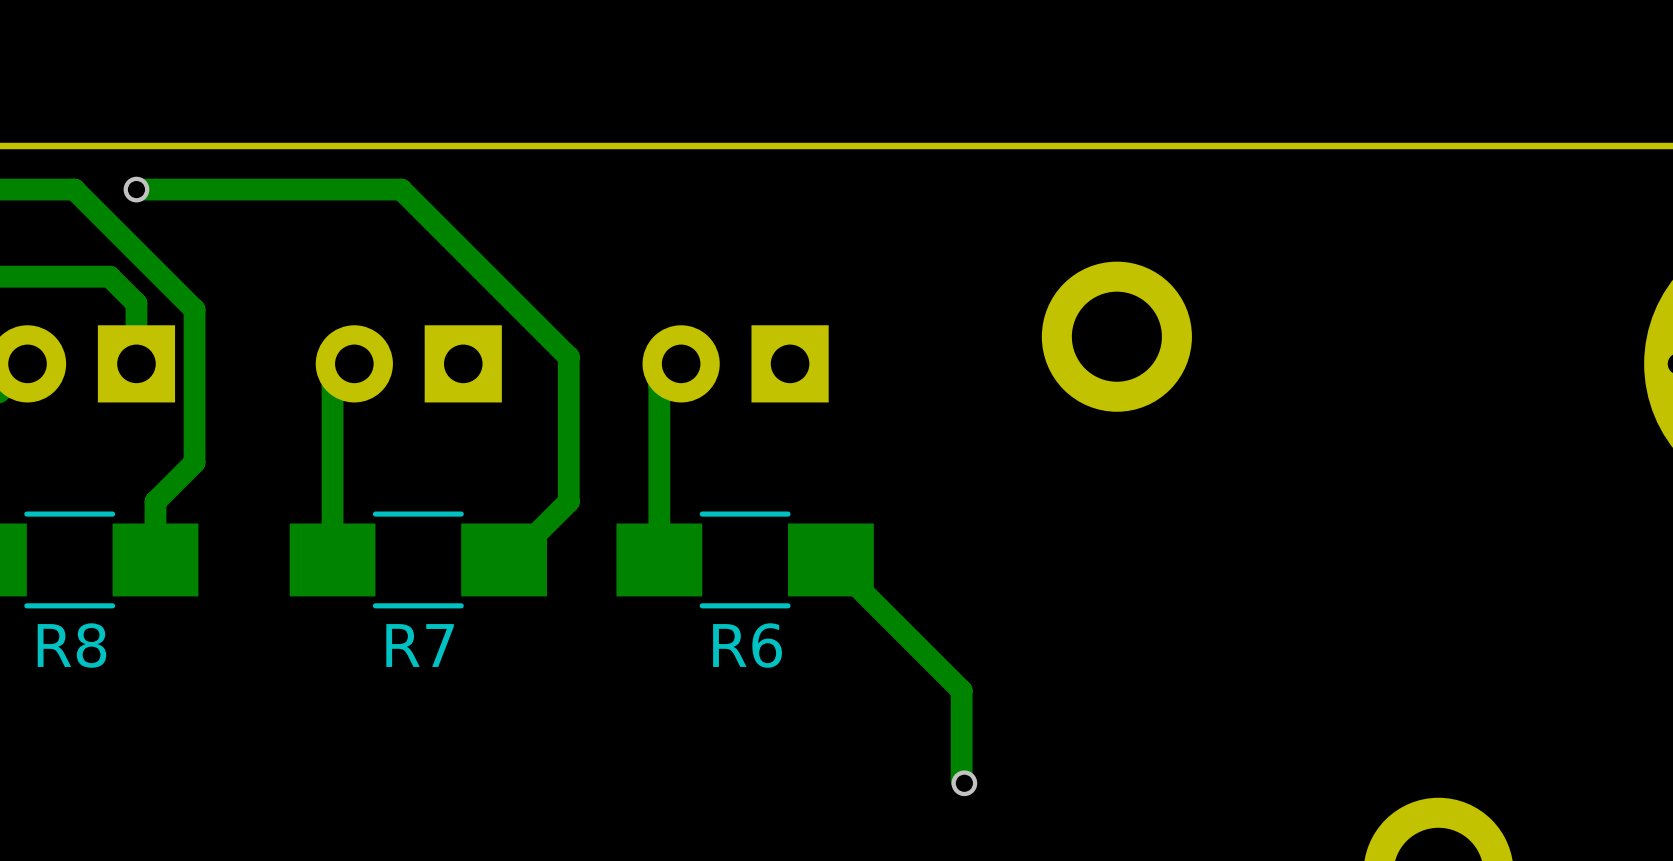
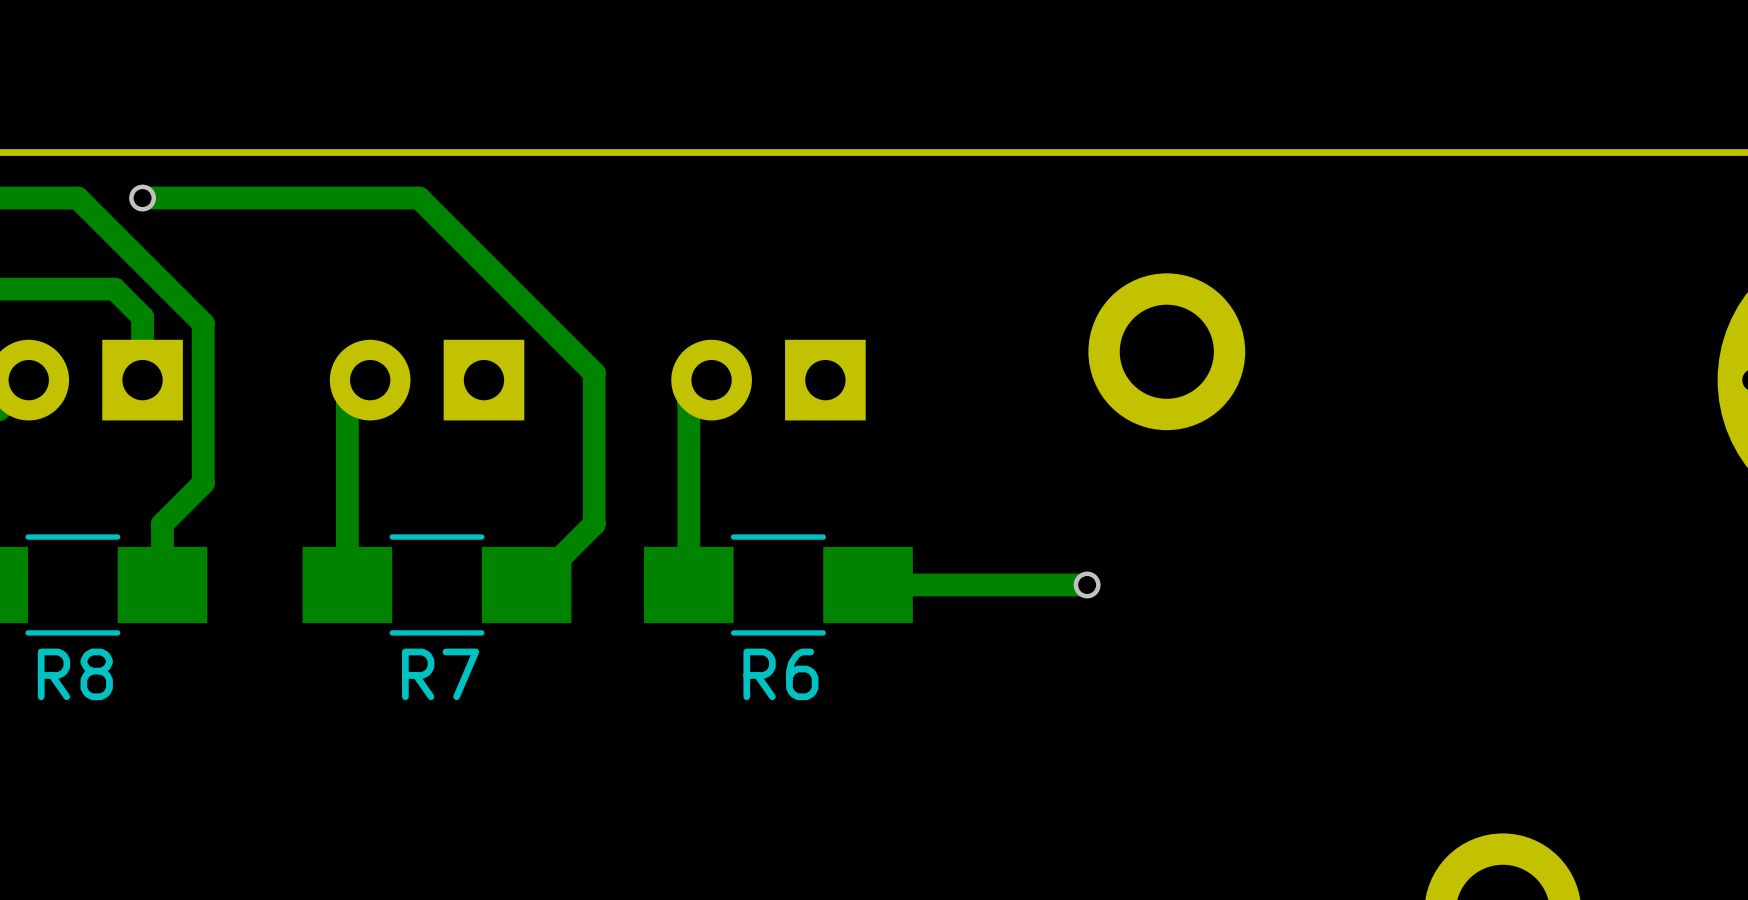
track: (830, 559) (961, 690) (961, 780) (964, 783) -> (868, 584) (1087, 584)
via position: (964, 783) -> (1087, 584)

